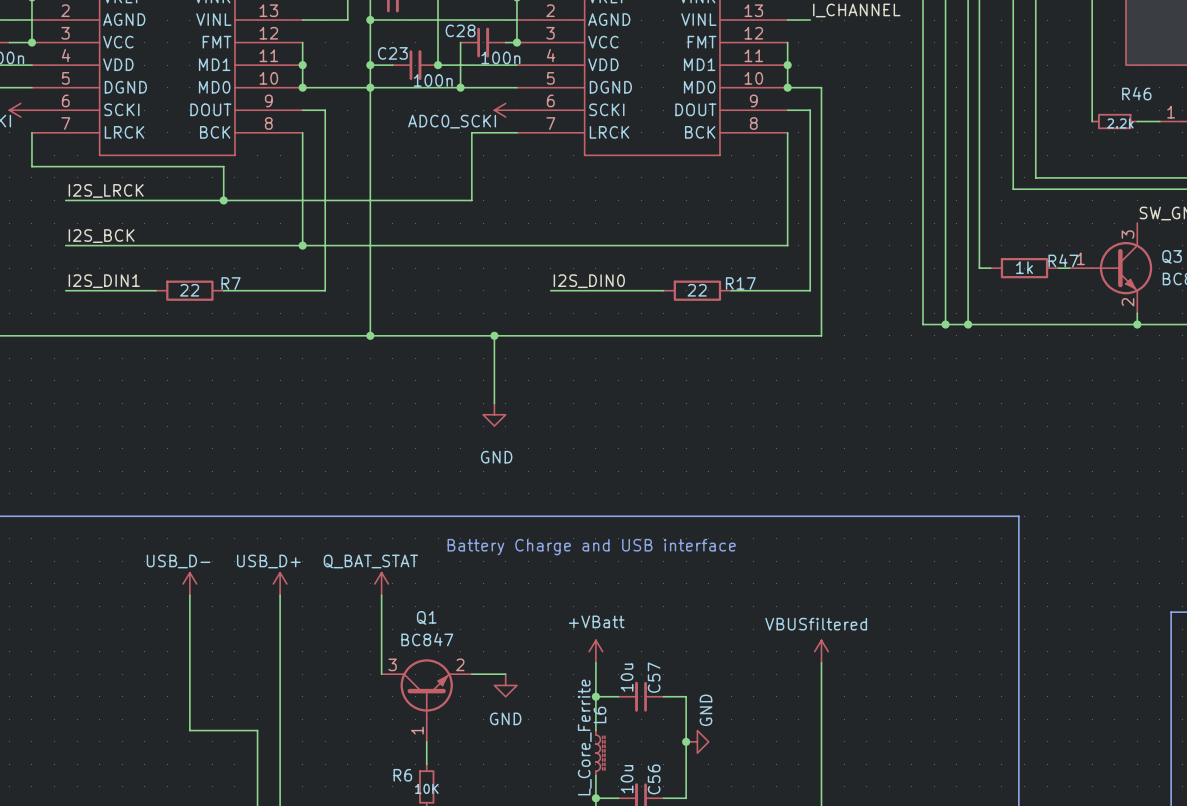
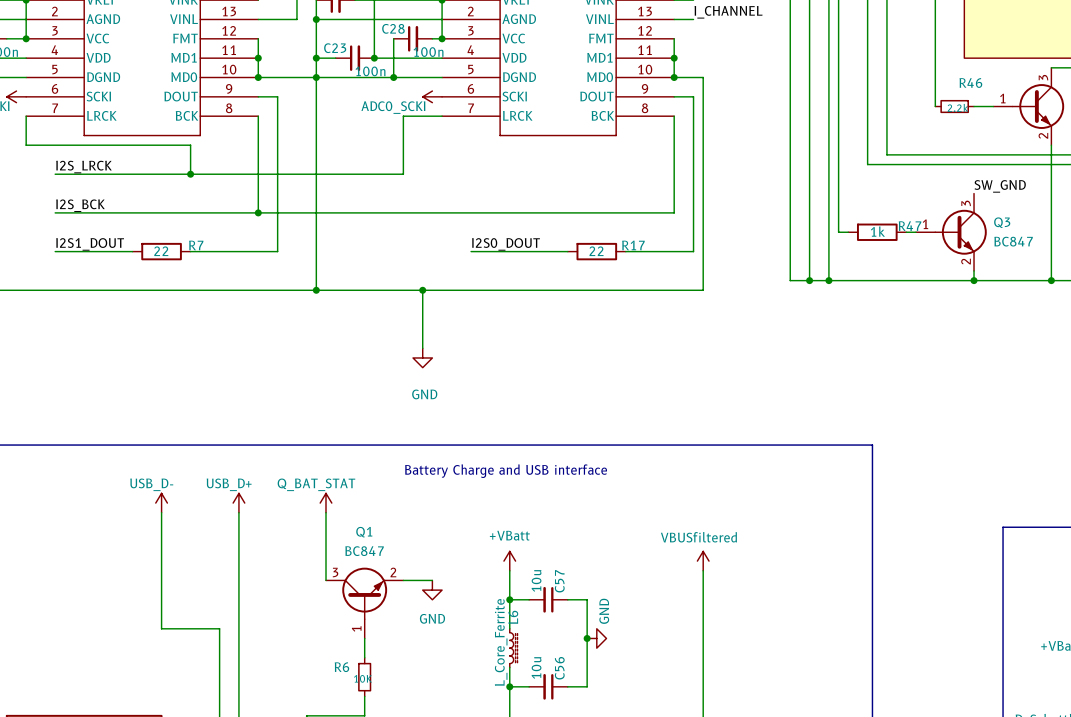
label: I2S_DIN1 (104, 281) -> I2S1_DOUT (90, 244)
label: I2S_DIN0 (589, 281) -> I2S0_DOUT (505, 244)

